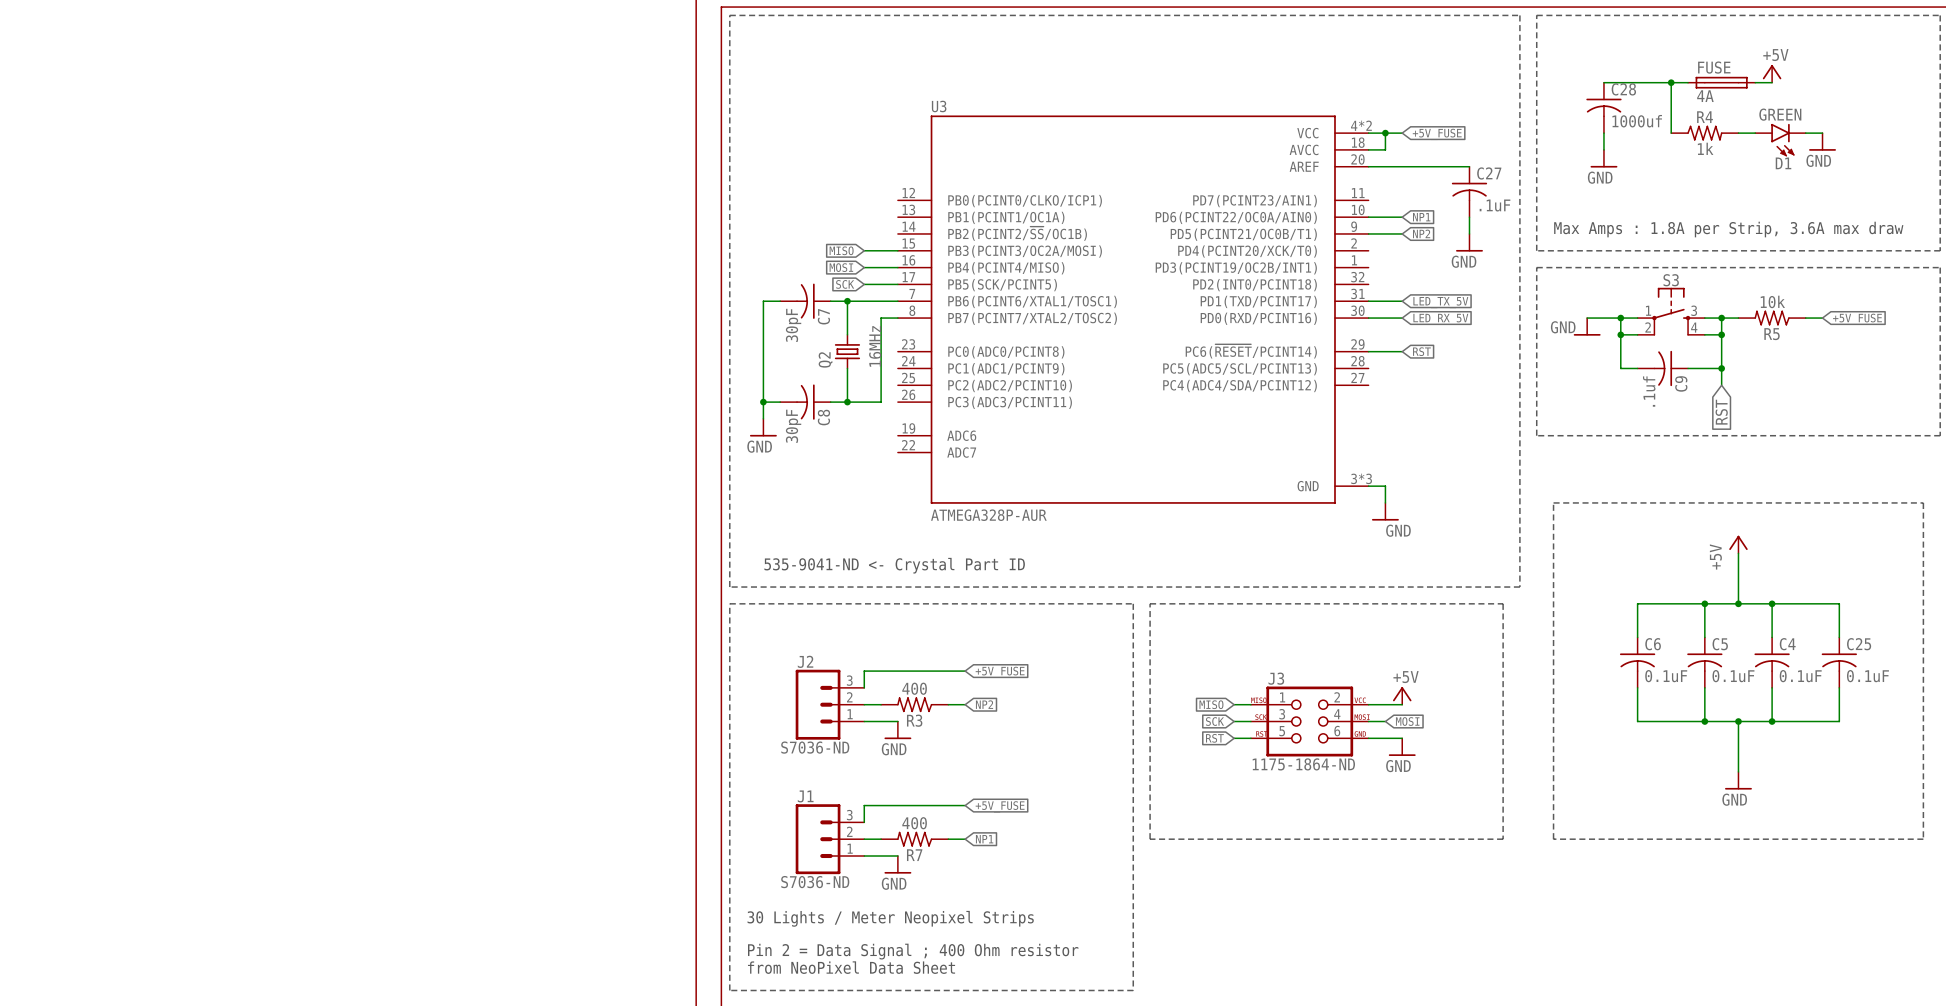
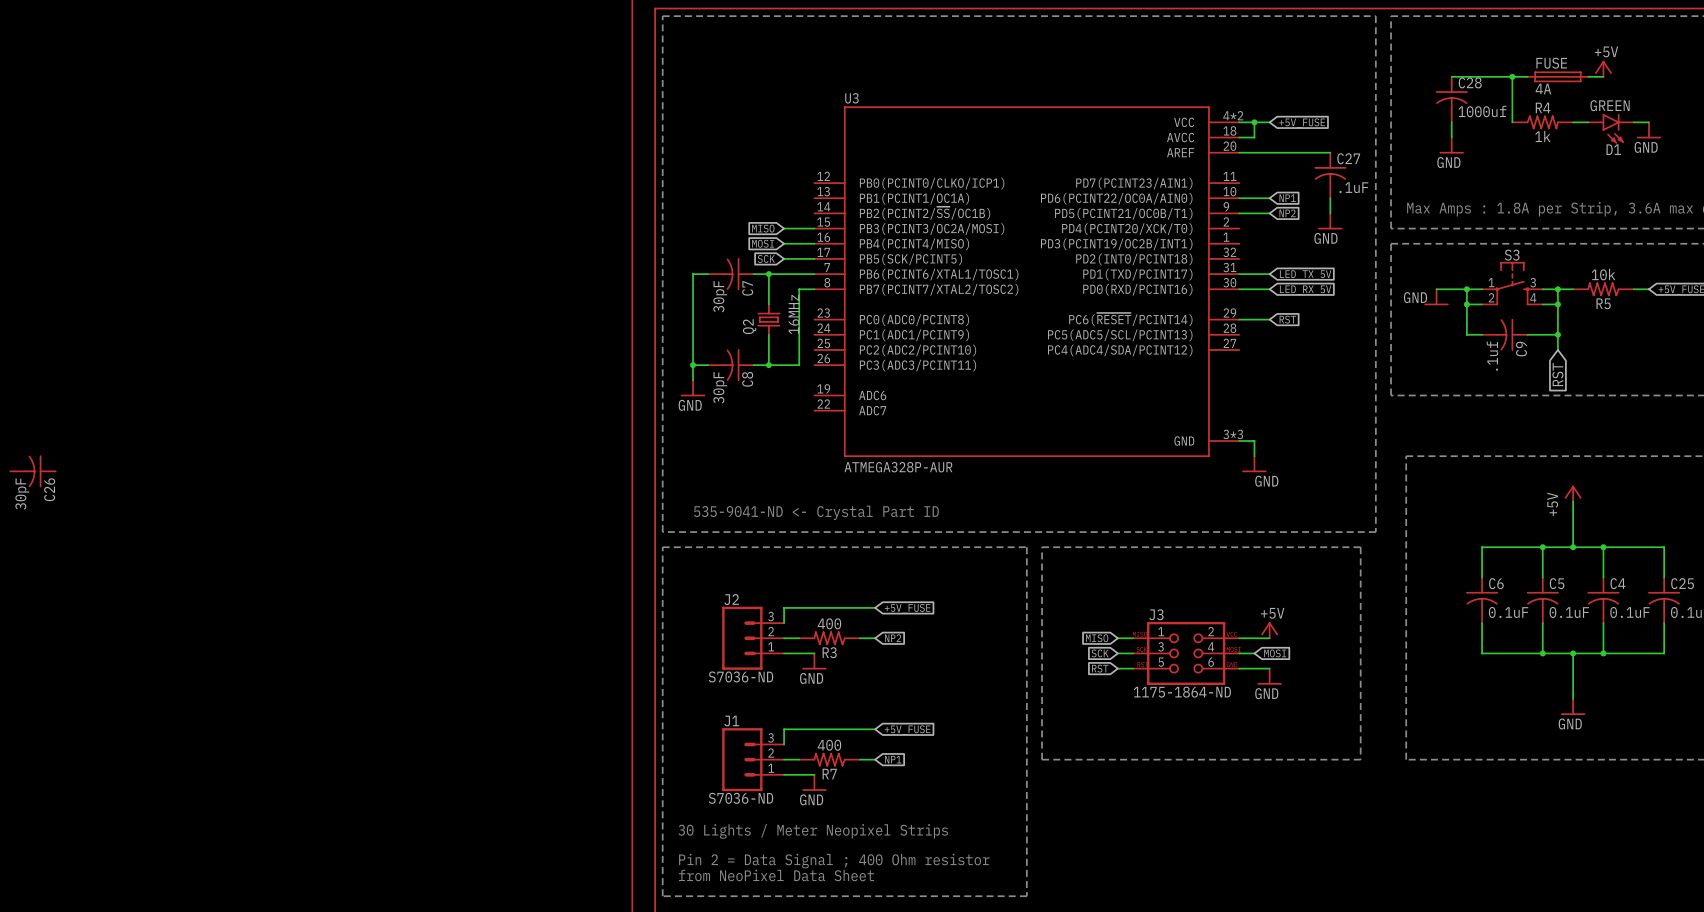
C26: none -> 30pF (32, 471)

